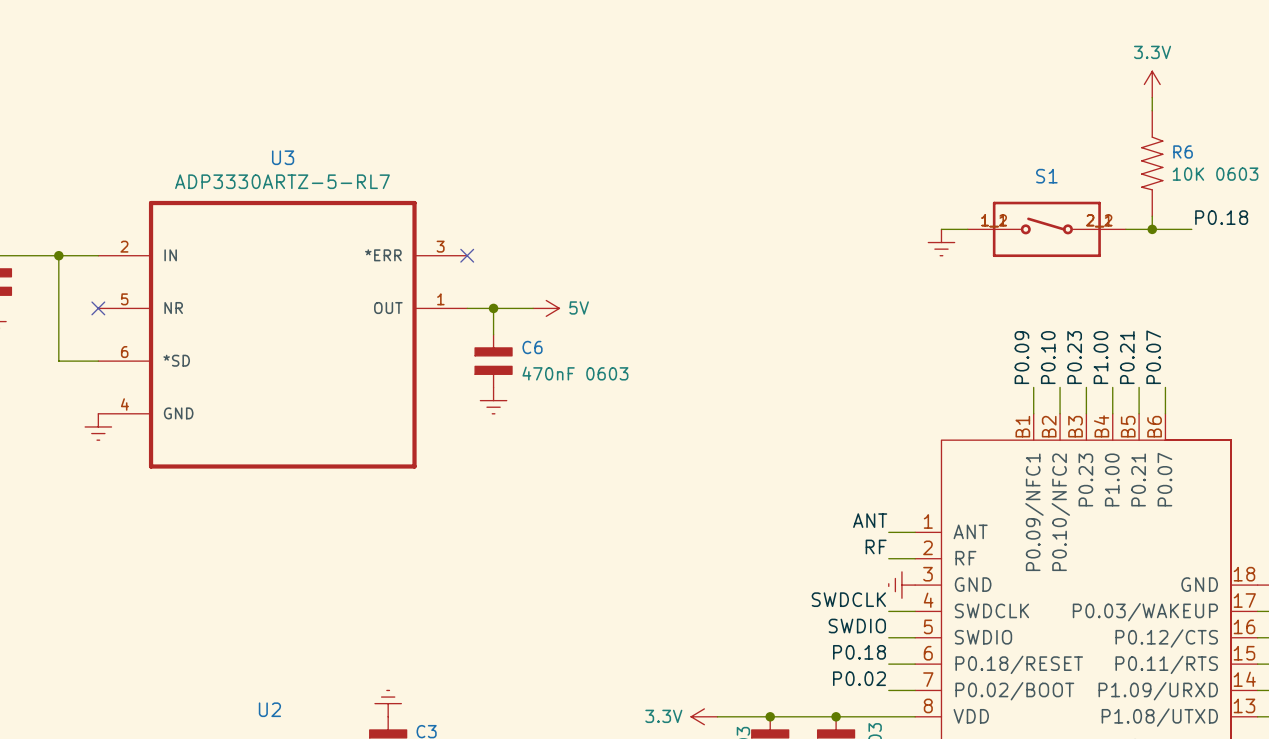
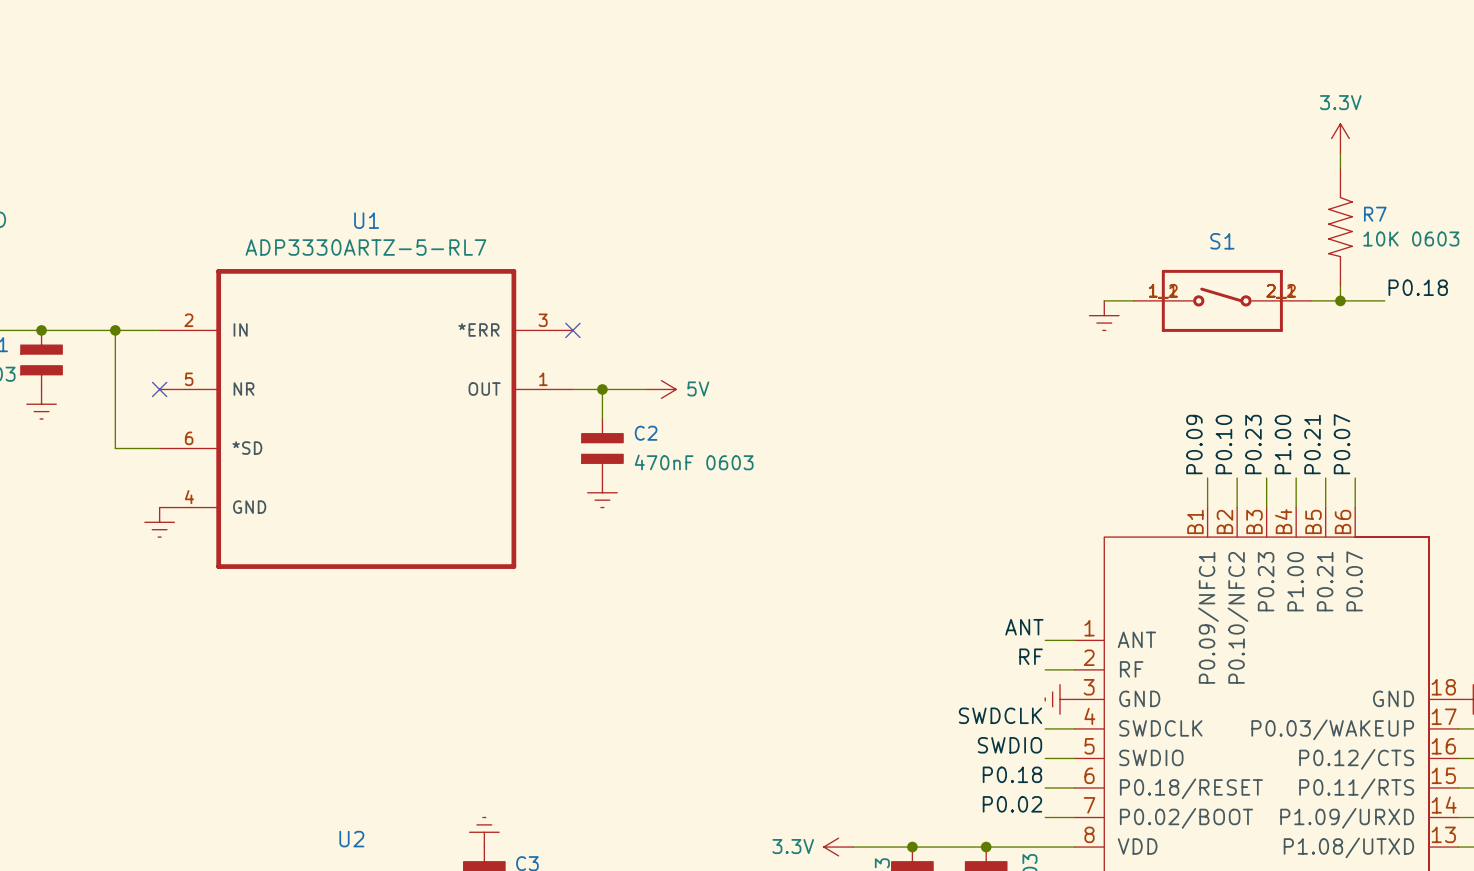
R6 name: R6 (1183, 151) -> R7 (1375, 214)
U3 name: U3 (283, 157) -> U1 (366, 220)
C6 name: C6 (532, 347) -> C2 (646, 433)

